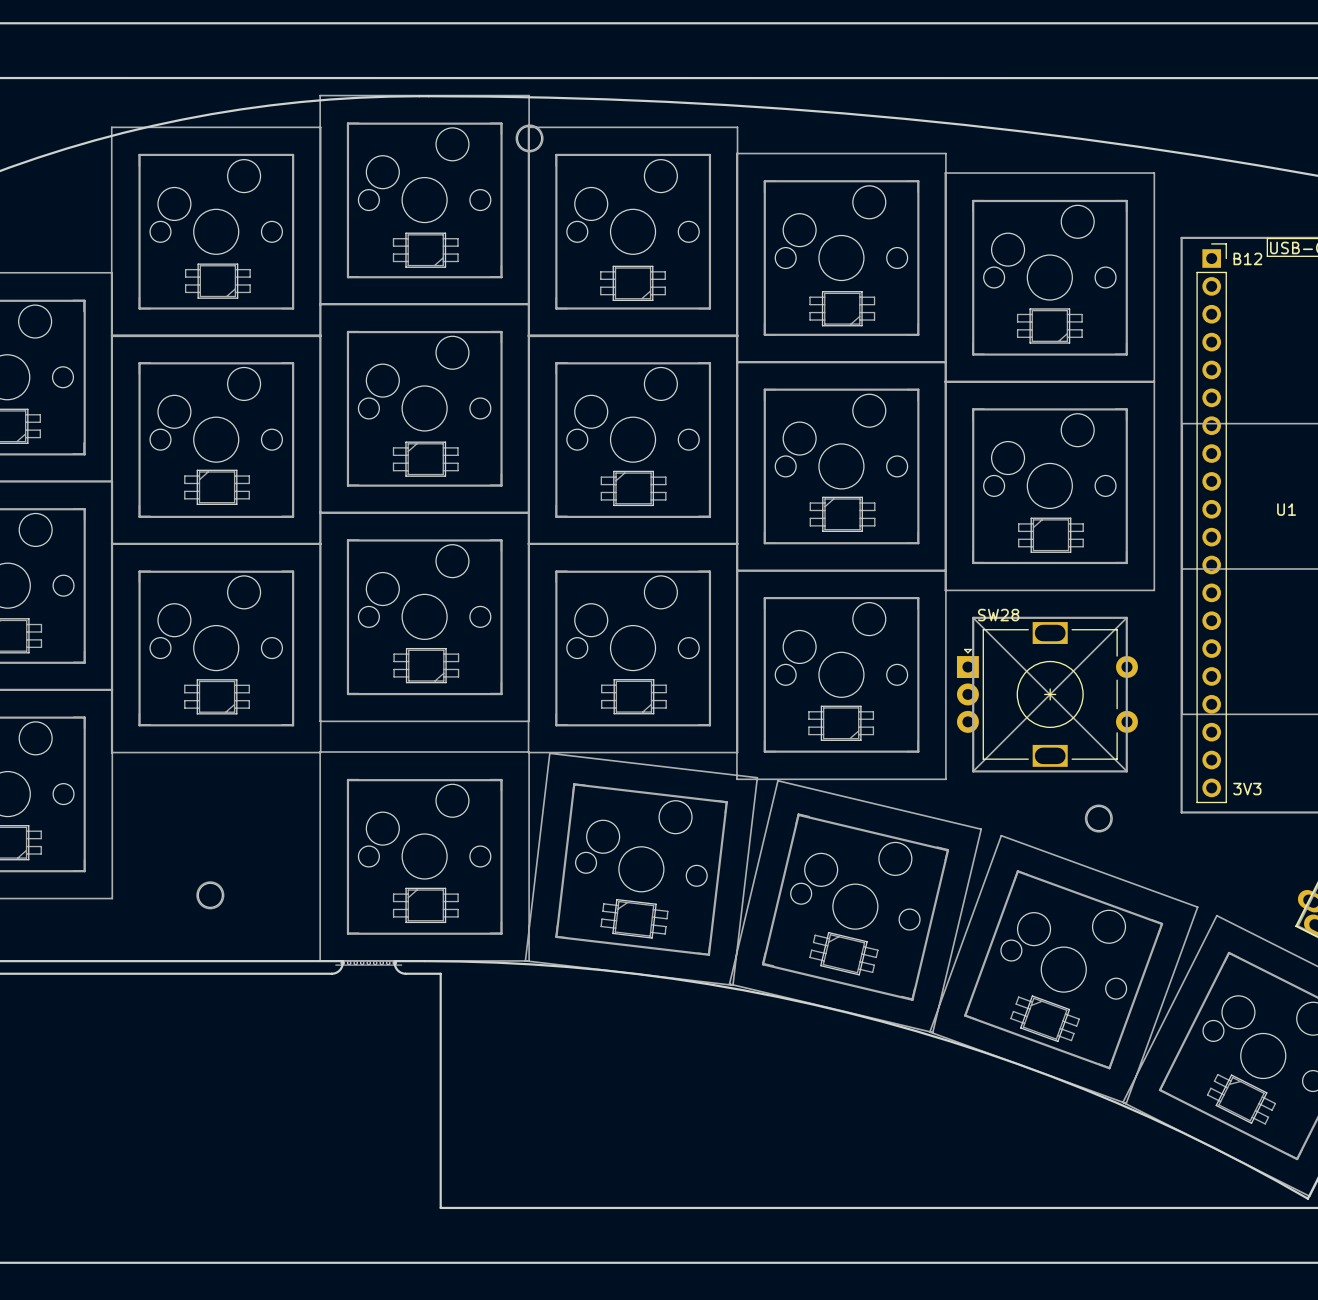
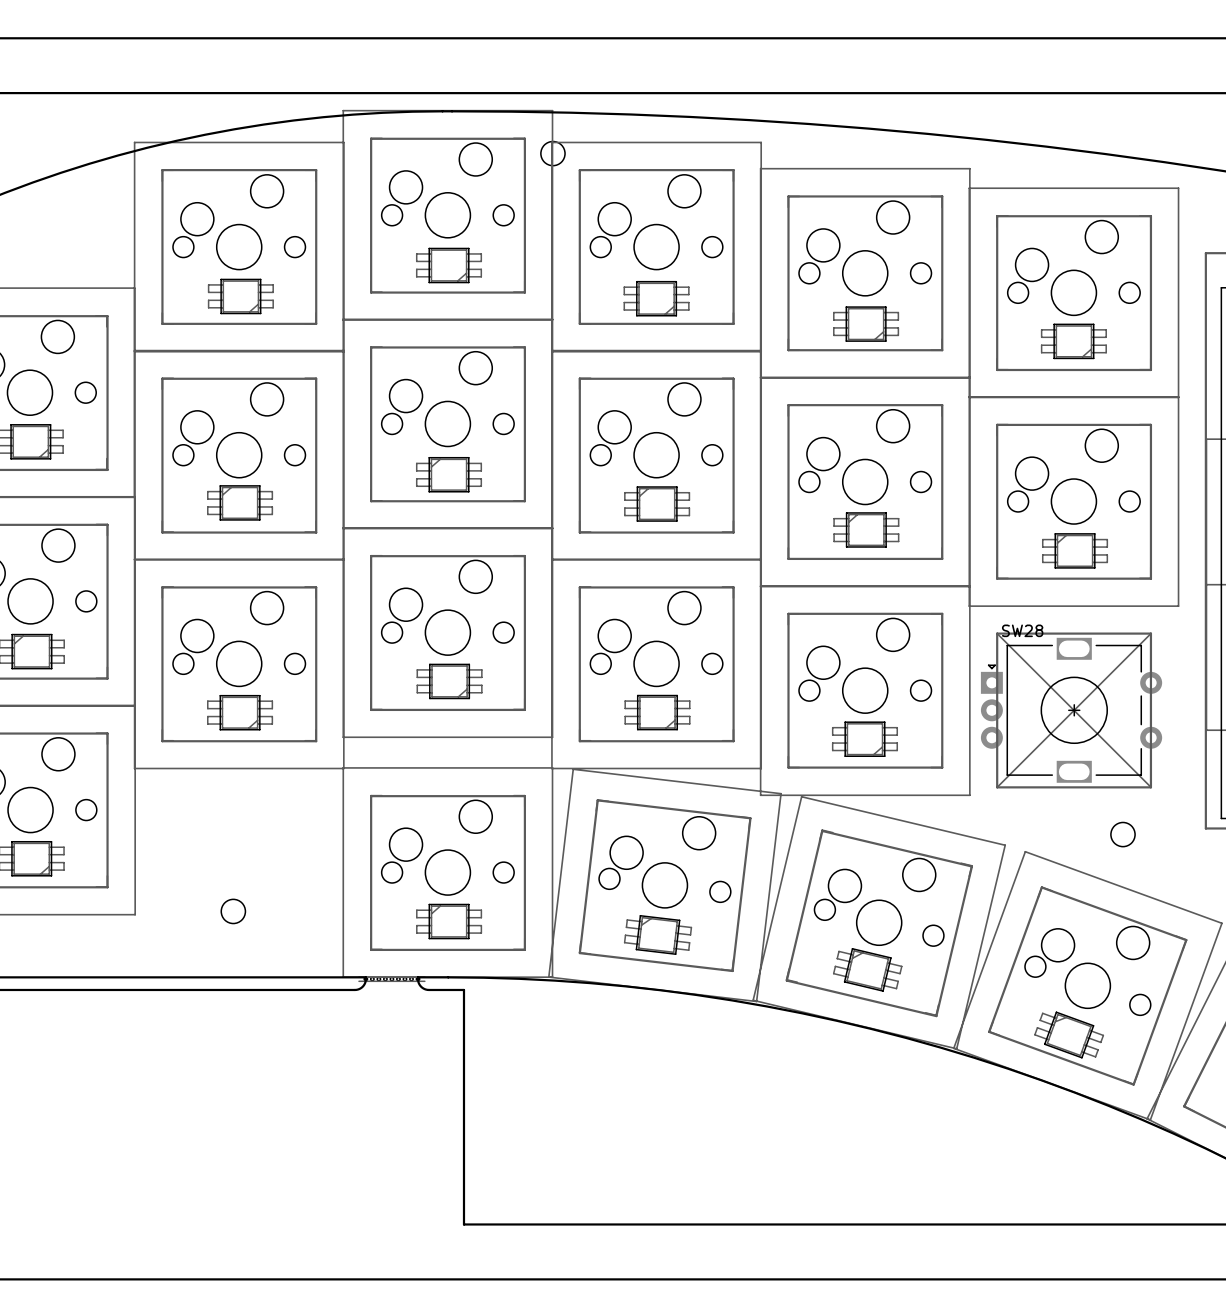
drawing: [515, 124, 544, 153] -> none
drawing: [1084, 804, 1113, 833] -> none
drawing: [196, 881, 225, 910] -> none

